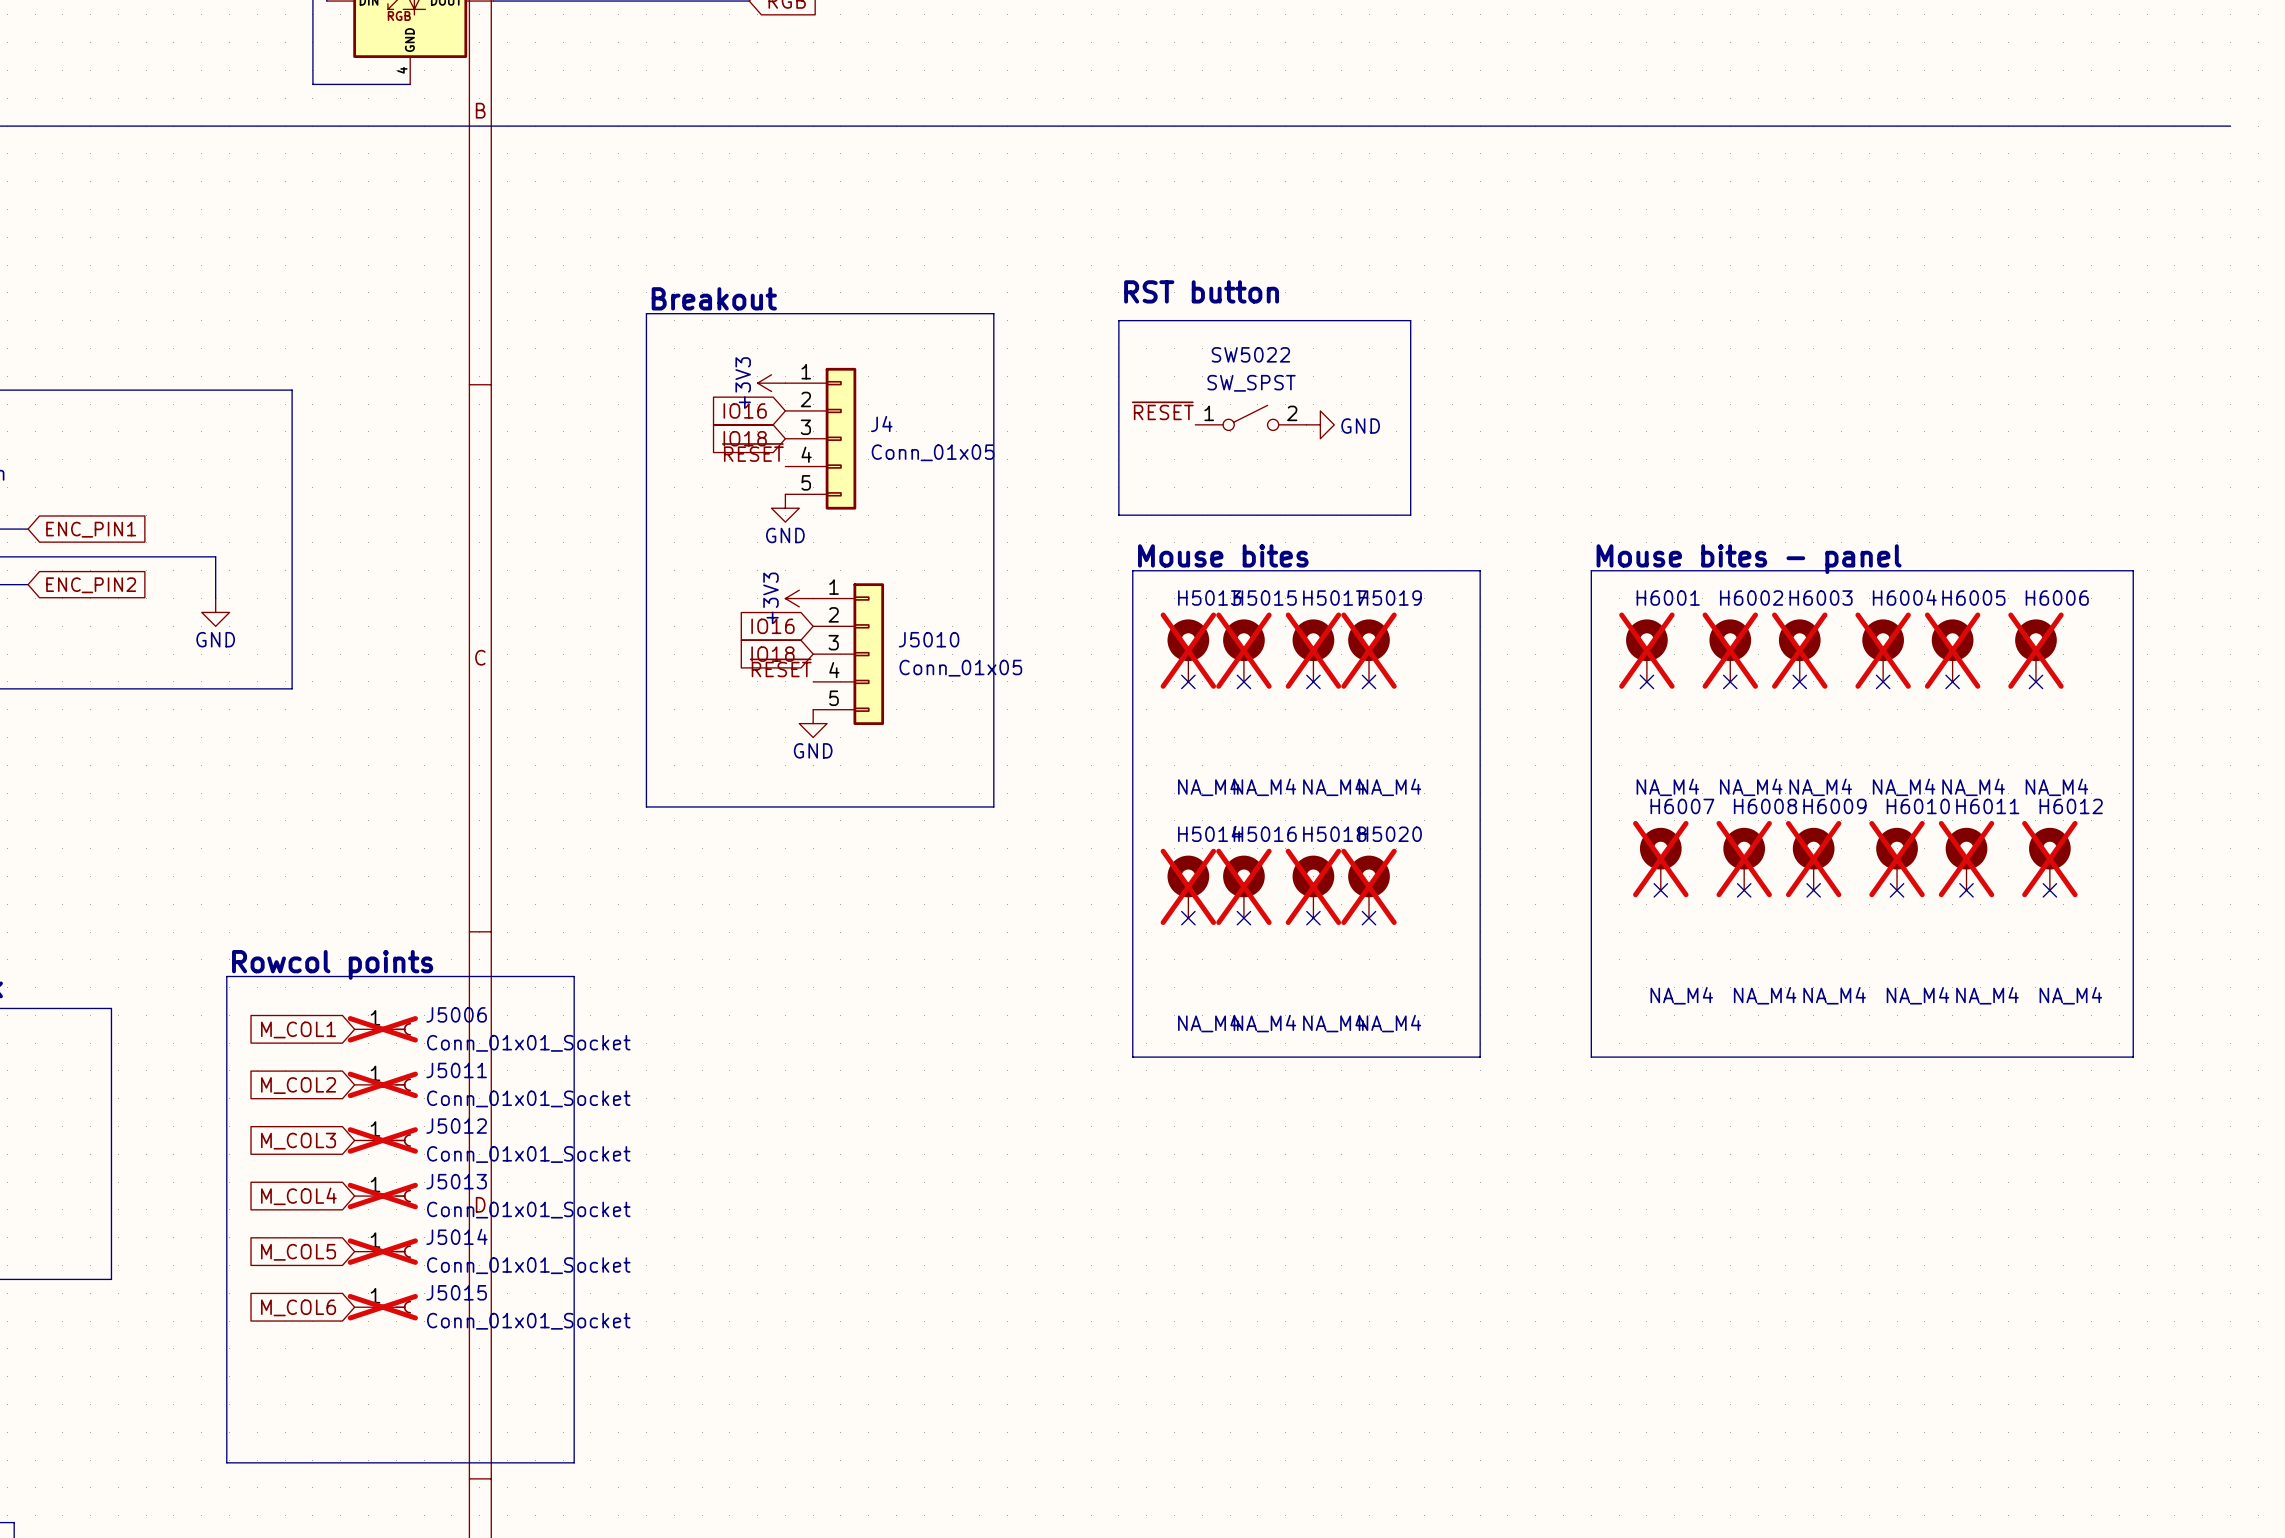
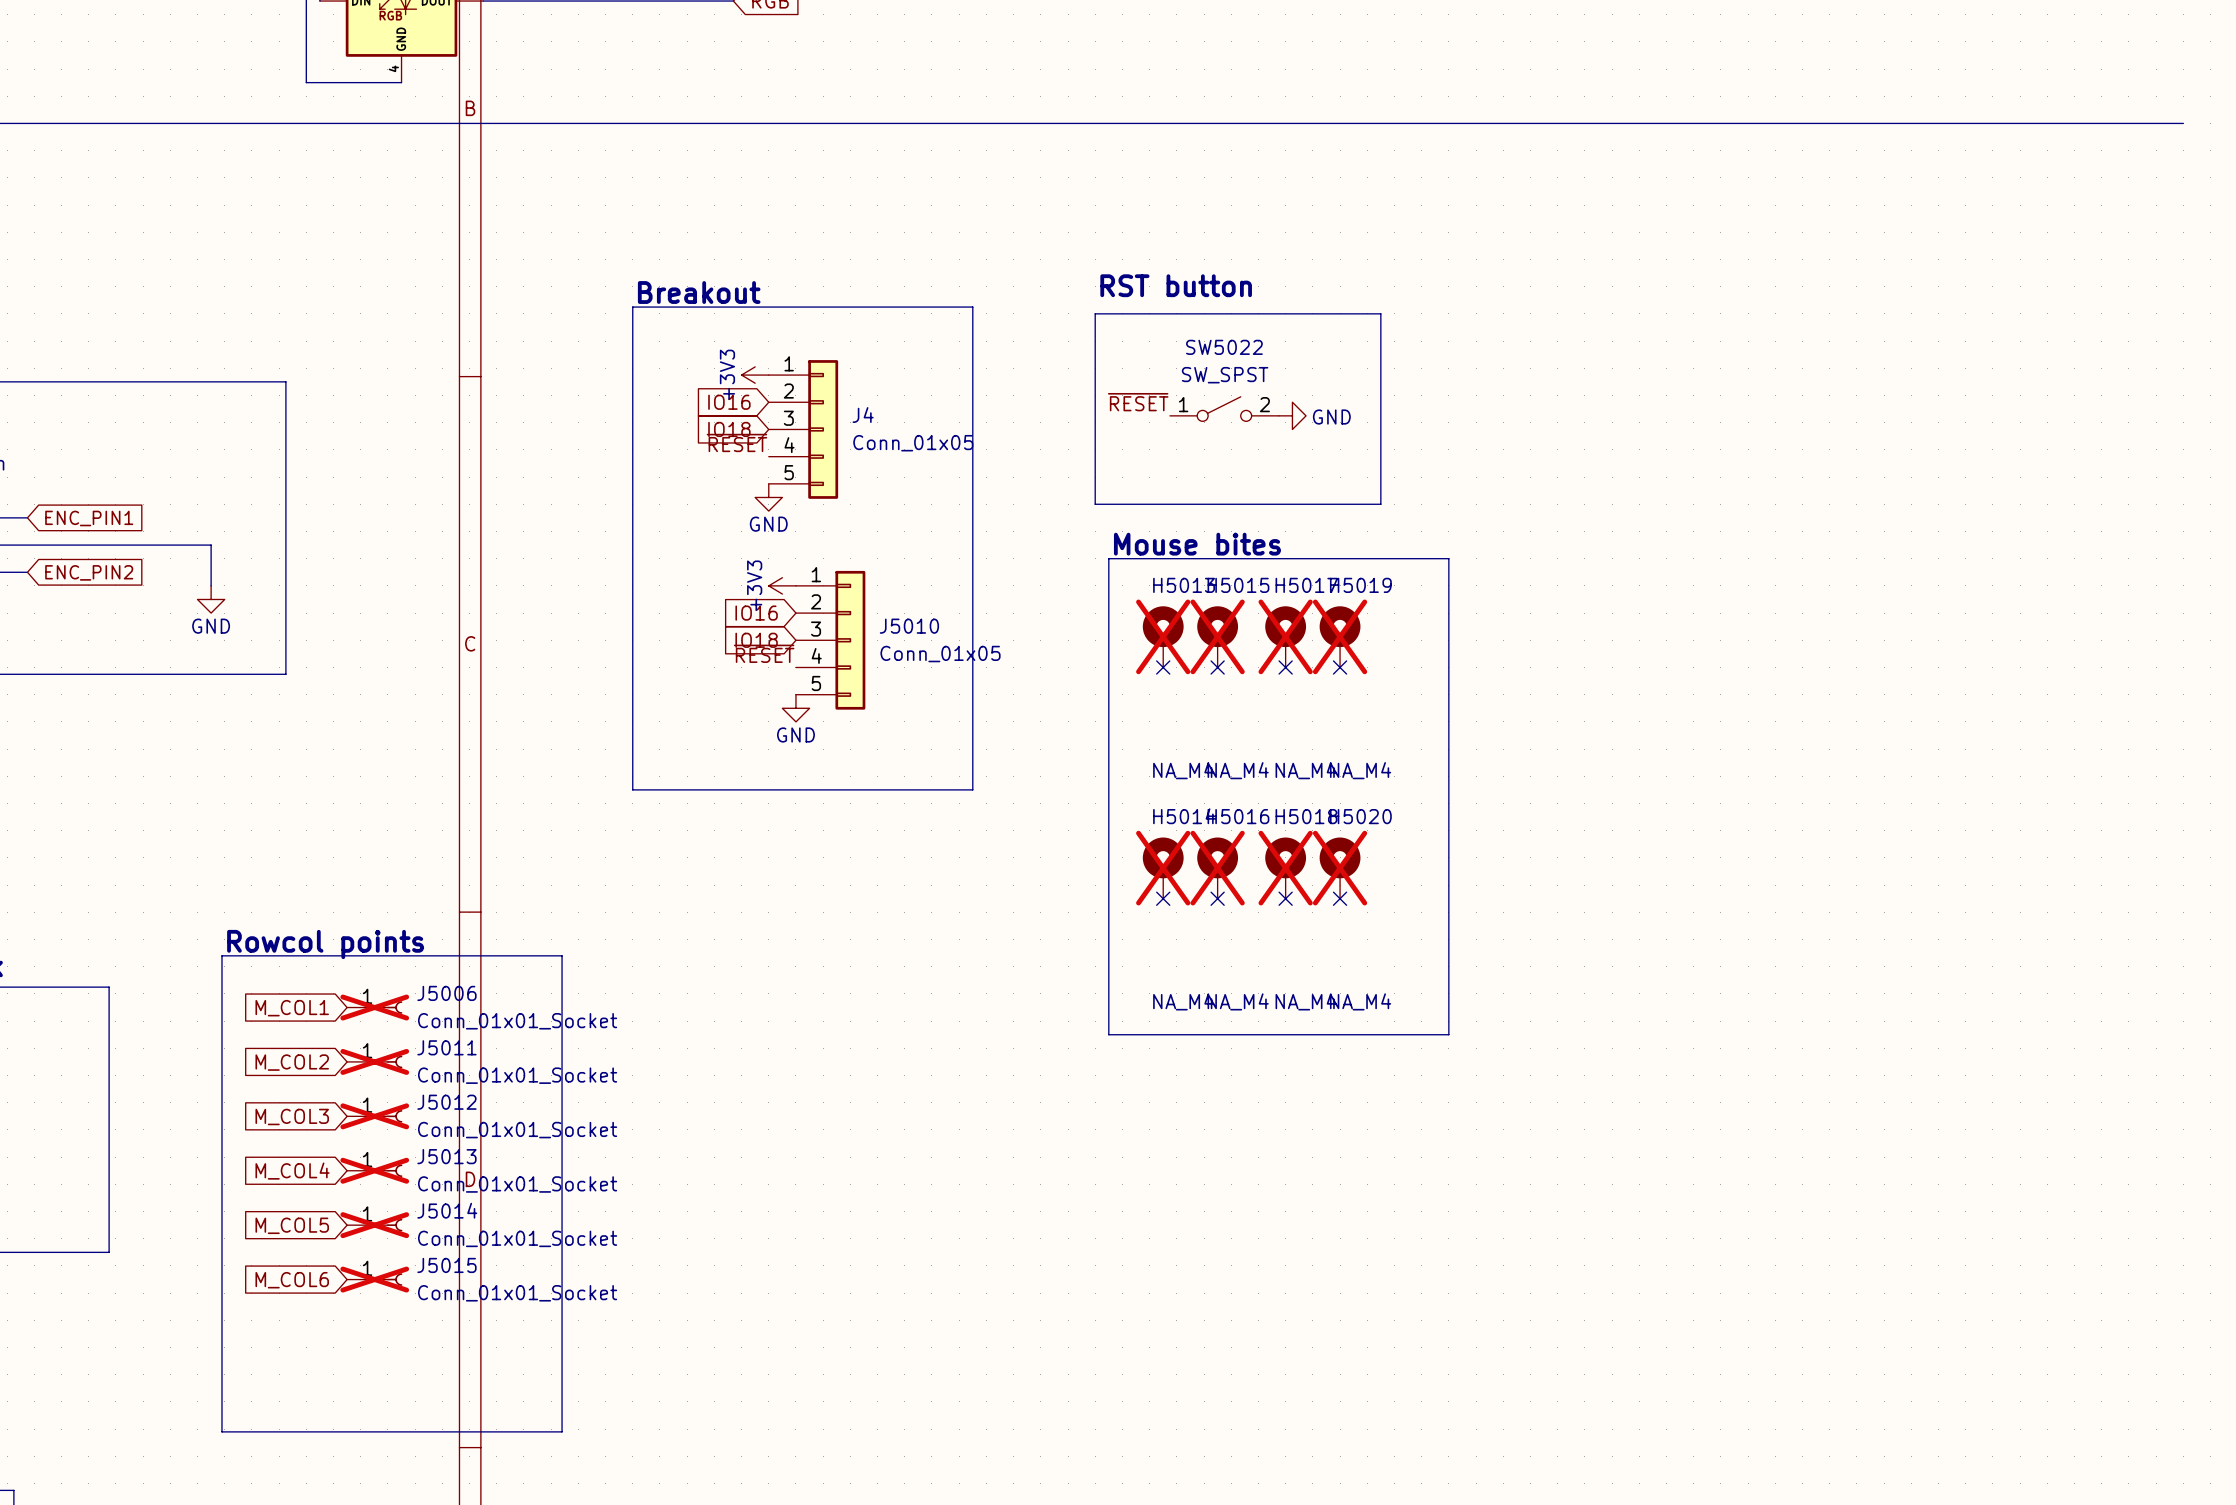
text: Mouse bites - panel (1749, 559) -> none
line: (1591, 570) (2133, 570) (2133, 1057) (1591, 1057) (1591, 570) -> none
H6001: NA_M4 (1646, 650) -> none
H6002: NA_M4 (1730, 650) -> none
H6003: NA_M4 (1799, 650) -> none
H6004: NA_M4 (1883, 650) -> none
H6005: NA_M4 (1952, 650) -> none
H6006: NA_M4 (2035, 650) -> none
no-connect mark: (1646, 681) -> none
no-connect mark: (1730, 681) -> none
no-connect mark: (1799, 681) -> none
no-connect mark: (1883, 681) -> none
no-connect mark: (1952, 681) -> none
no-connect mark: (2035, 681) -> none
H6007: NA_M4 (1660, 859) -> none
H6008: NA_M4 (1744, 859) -> none
H6009: NA_M4 (1813, 859) -> none
H6010: NA_M4 (1897, 859) -> none
H6011: NA_M4 (1966, 859) -> none
H6012: NA_M4 (2049, 859) -> none
no-connect mark: (1660, 890) -> none
no-connect mark: (1744, 890) -> none
no-connect mark: (1813, 890) -> none
no-connect mark: (1897, 890) -> none
no-connect mark: (1966, 890) -> none
no-connect mark: (2049, 890) -> none

